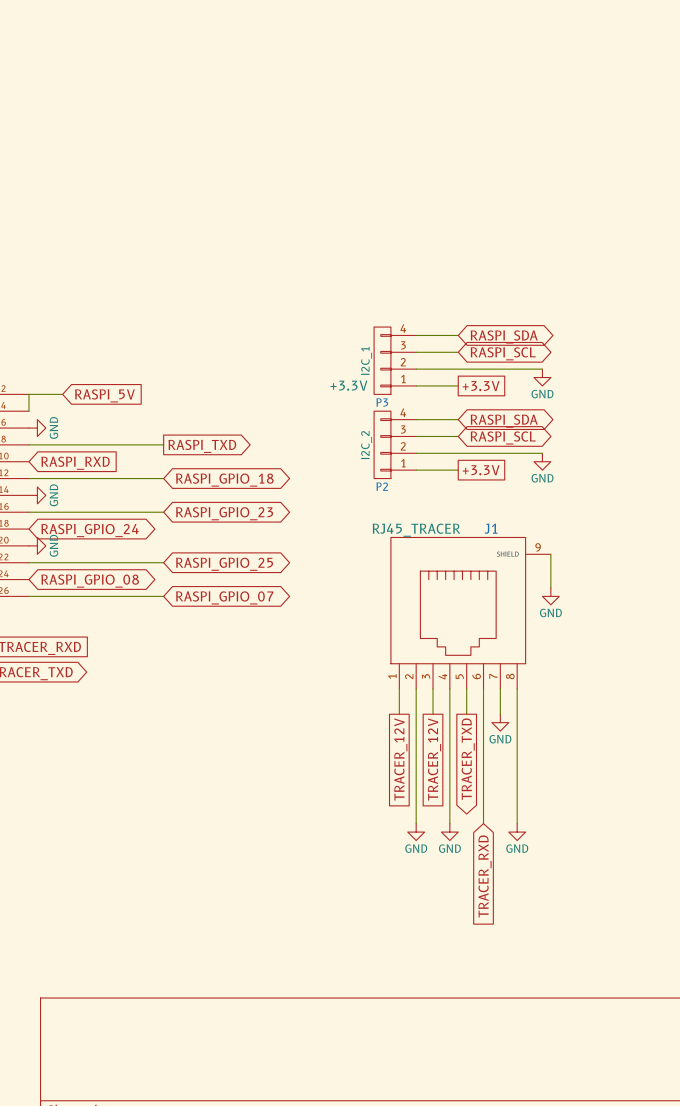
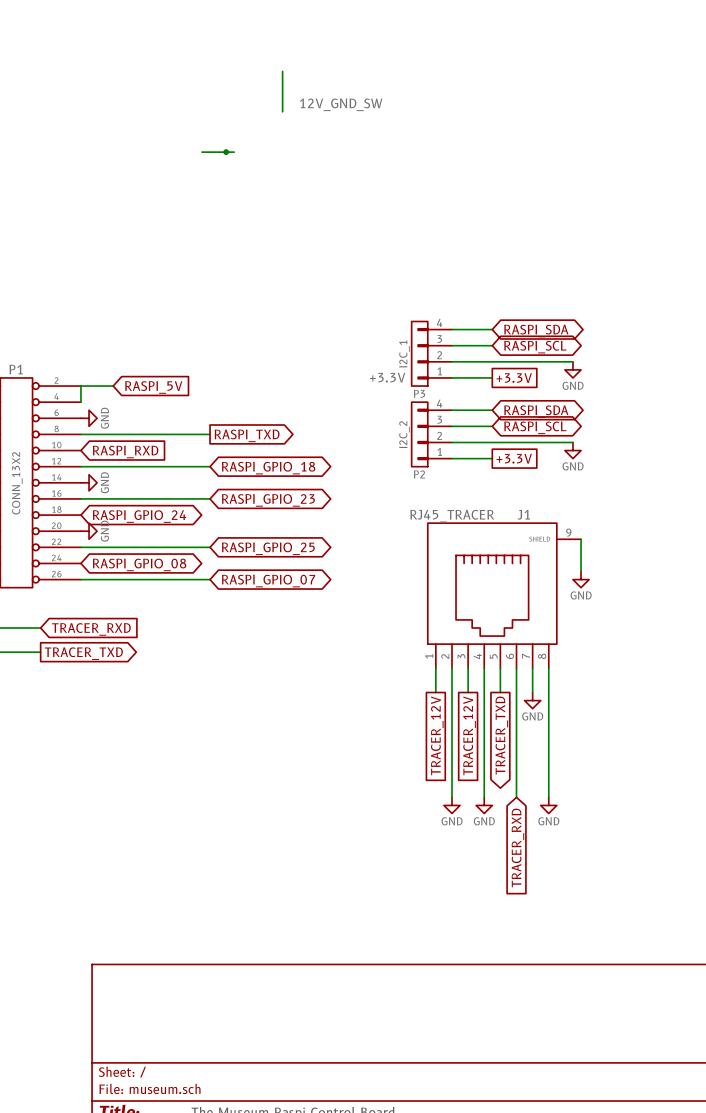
wire: none -> (282, 71) (282, 111)
label: none -> 12V_GND_SW (341, 104)
wire: none -> (201, 152) (234, 152)
junction: none -> (226, 152)

